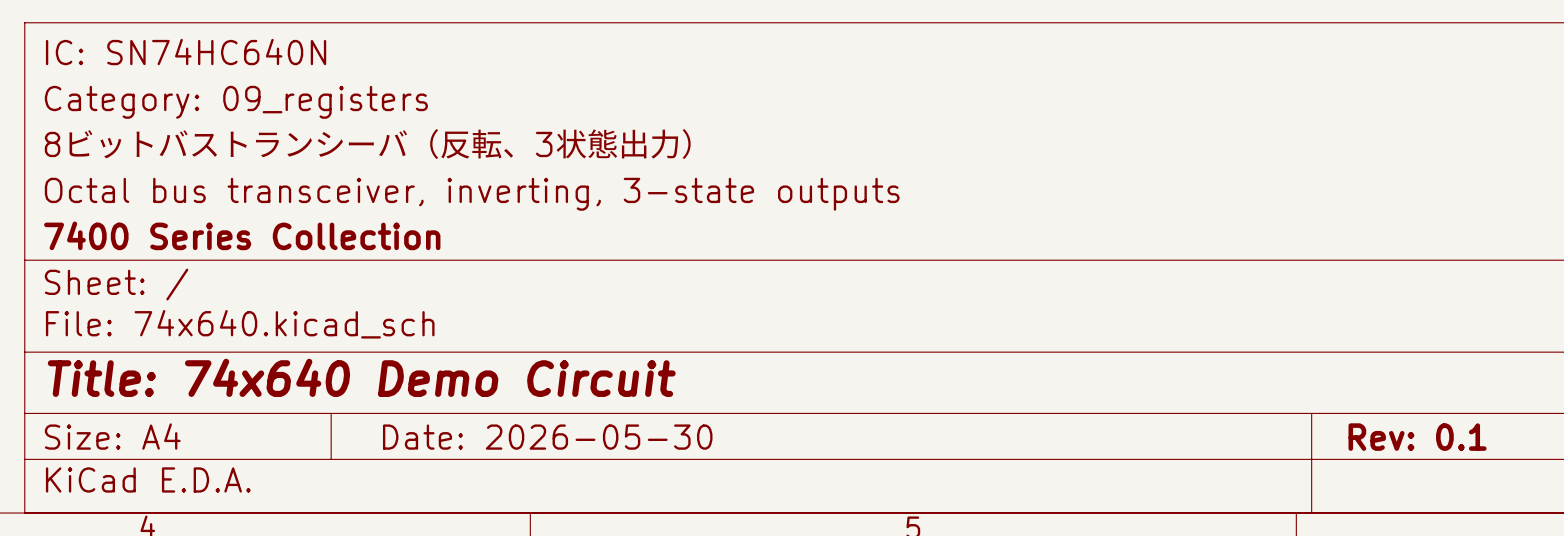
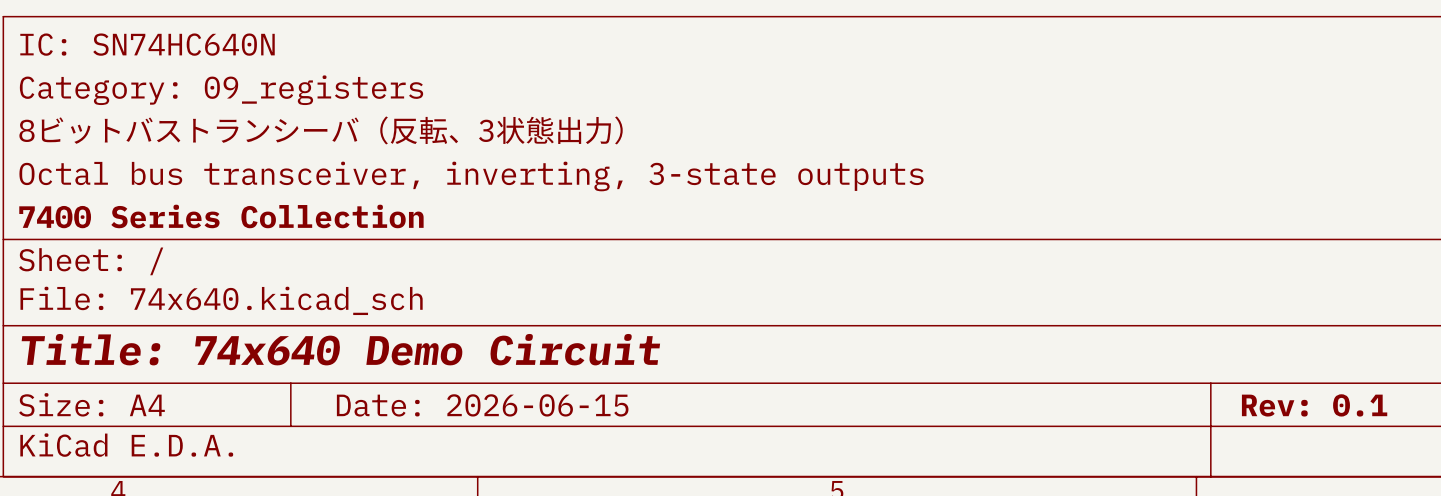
title block: Date: 2026-05-30 (547, 437) -> Date: 2026-06-15 (482, 405)

